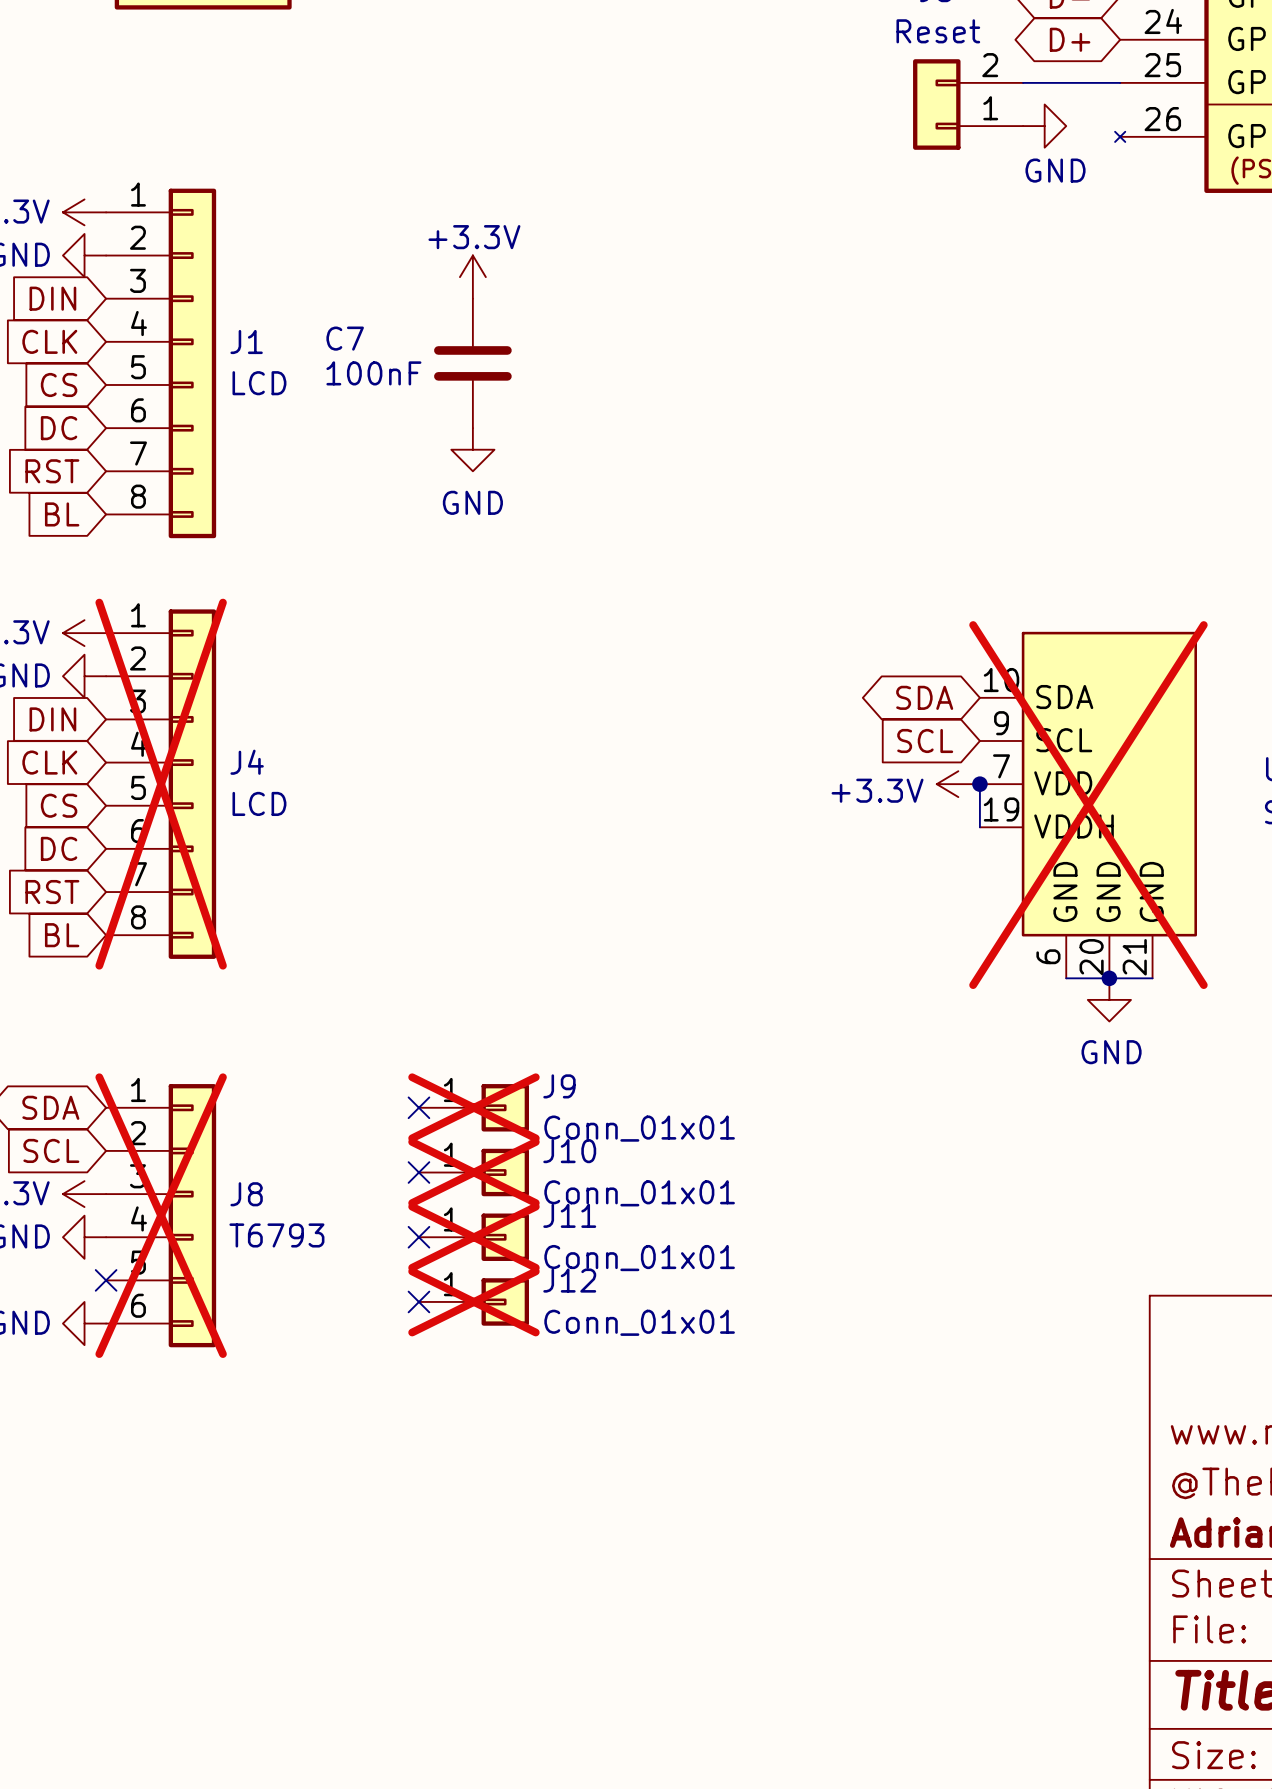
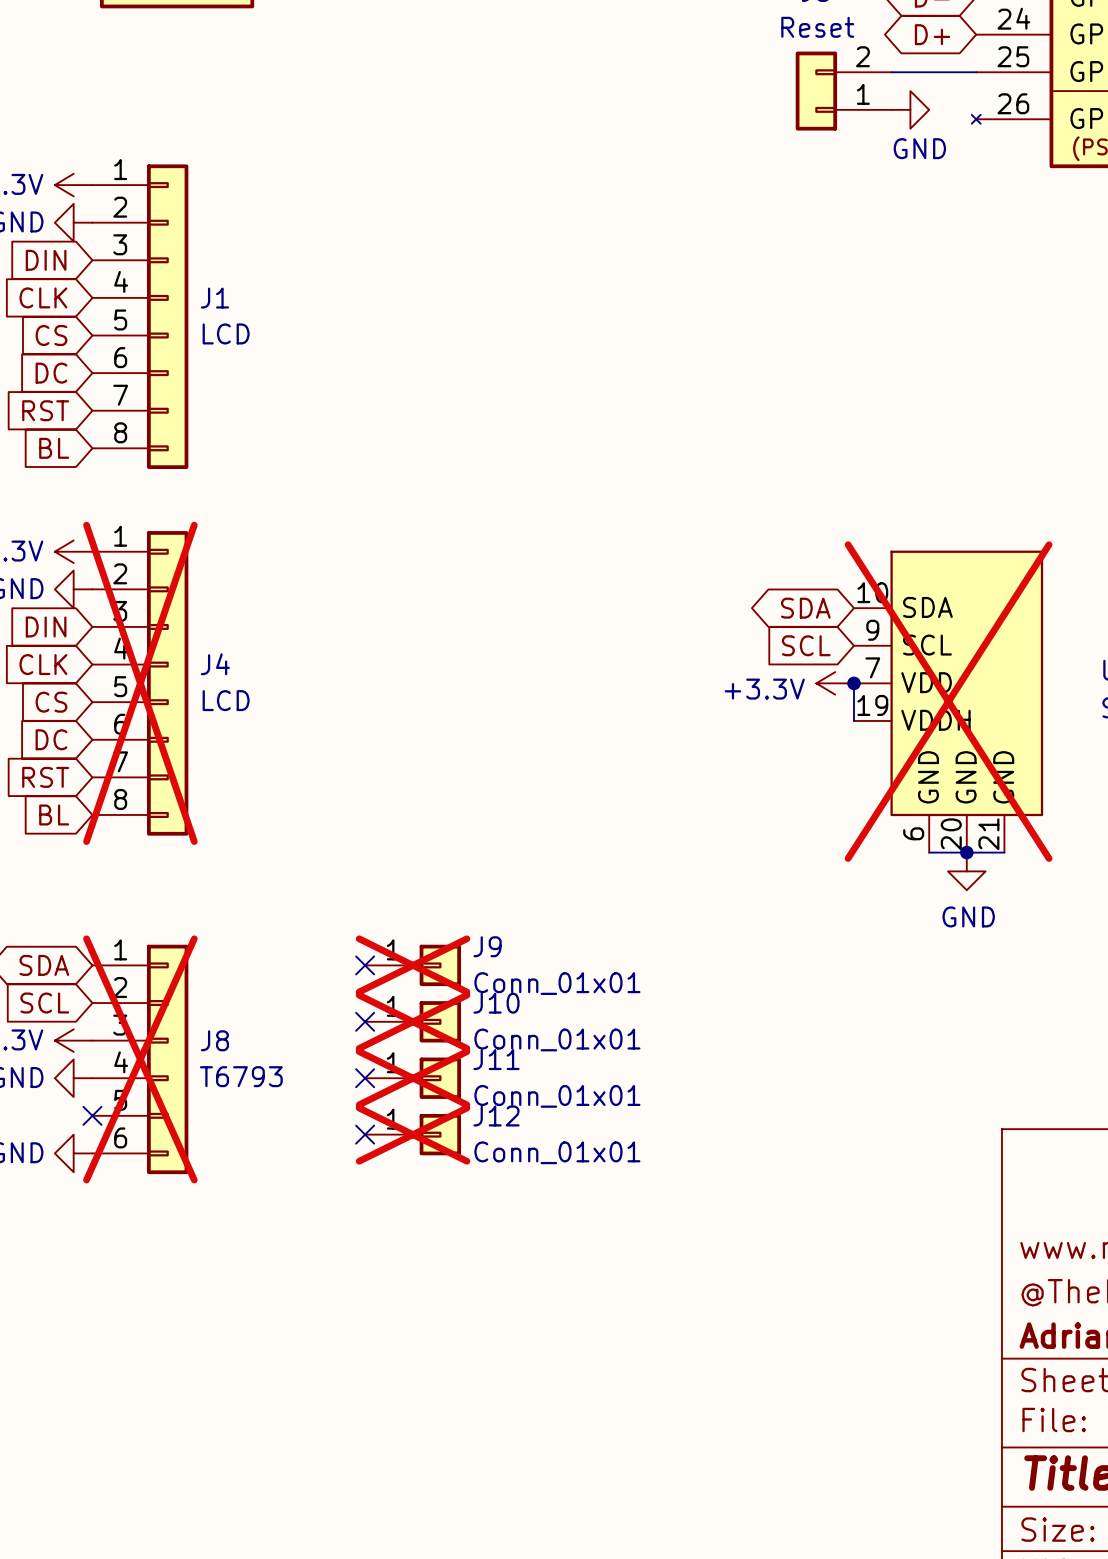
power symbol: +3.3V (472, 277) -> none
C7: 100nF (472, 363) -> none
power symbol: GND (472, 449) -> none

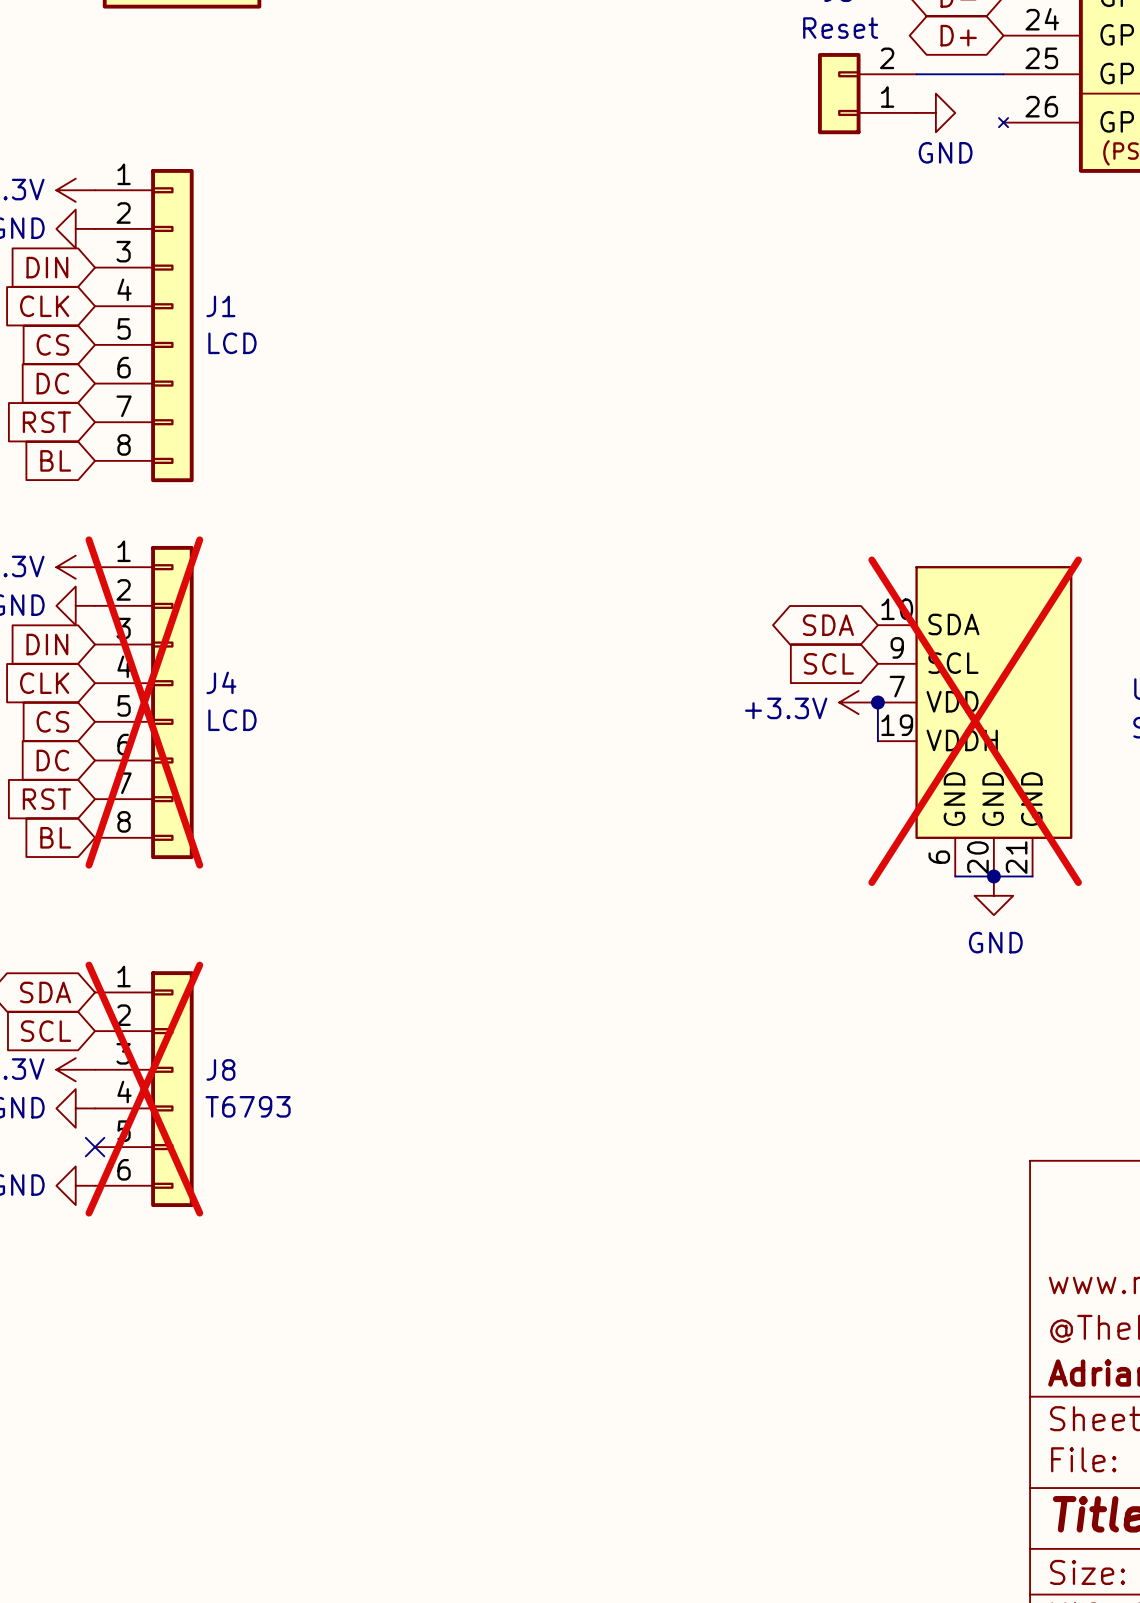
no-connect mark: (365, 965) -> none
J9: Conn_01x01 (413, 965) -> none
no-connect mark: (365, 1021) -> none
J10: Conn_01x01 (413, 1021) -> none
no-connect mark: (365, 1078) -> none
J11: Conn_01x01 (413, 1078) -> none
no-connect mark: (365, 1134) -> none
J12: Conn_01x01 (413, 1134) -> none

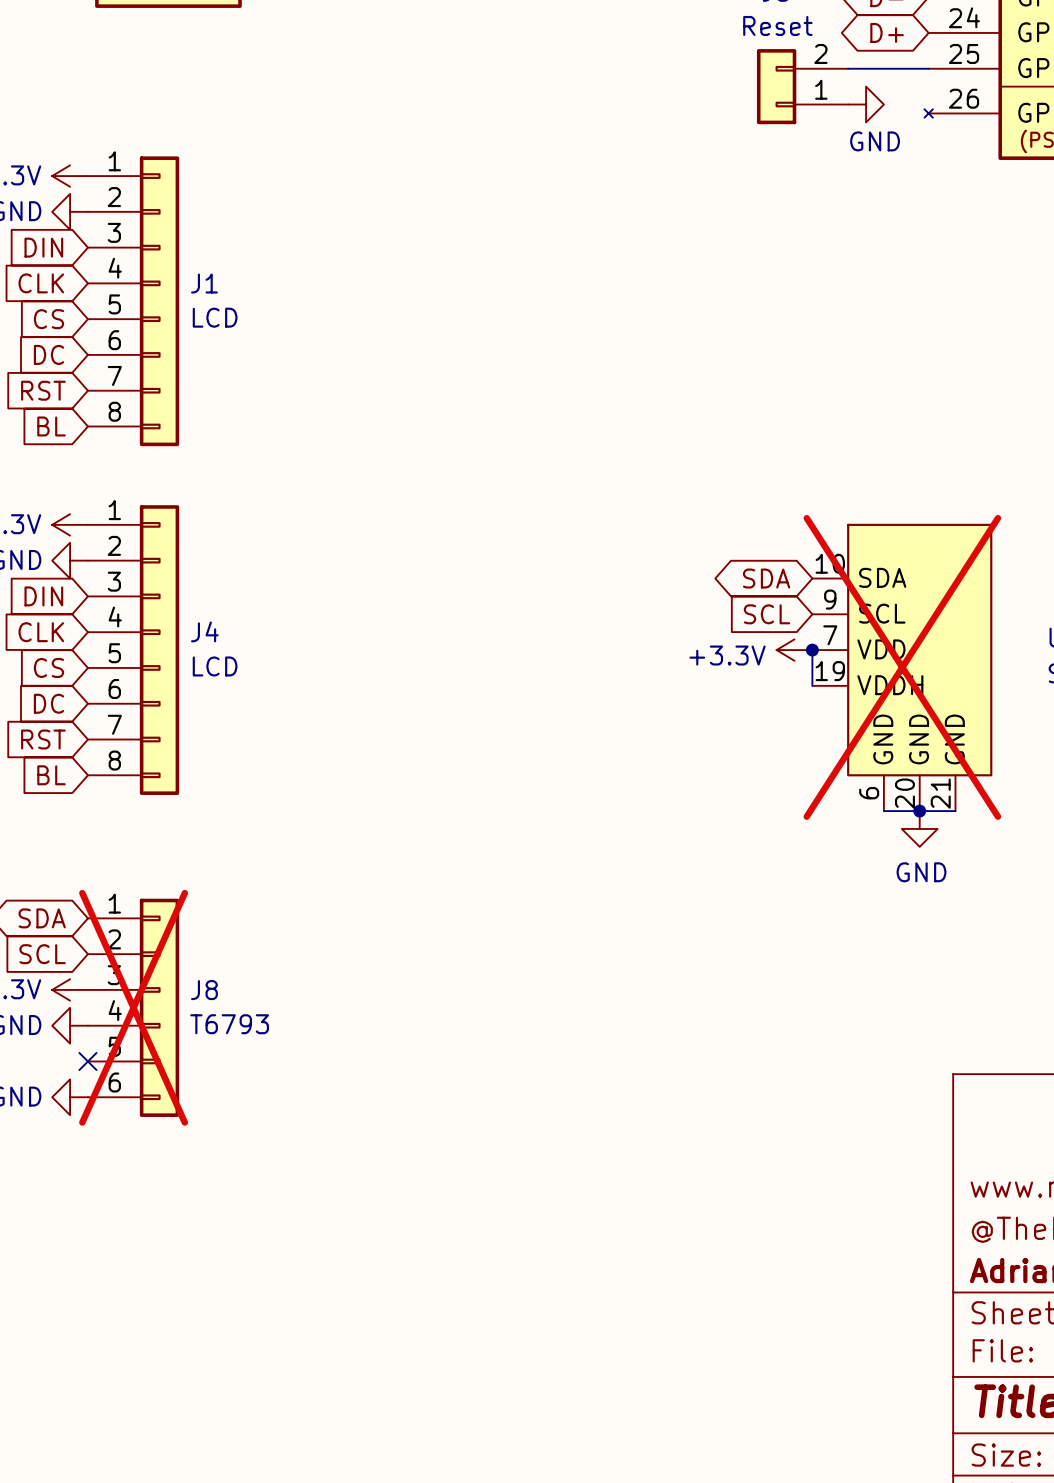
J4 do-not-place cross: (144, 702) -> none

